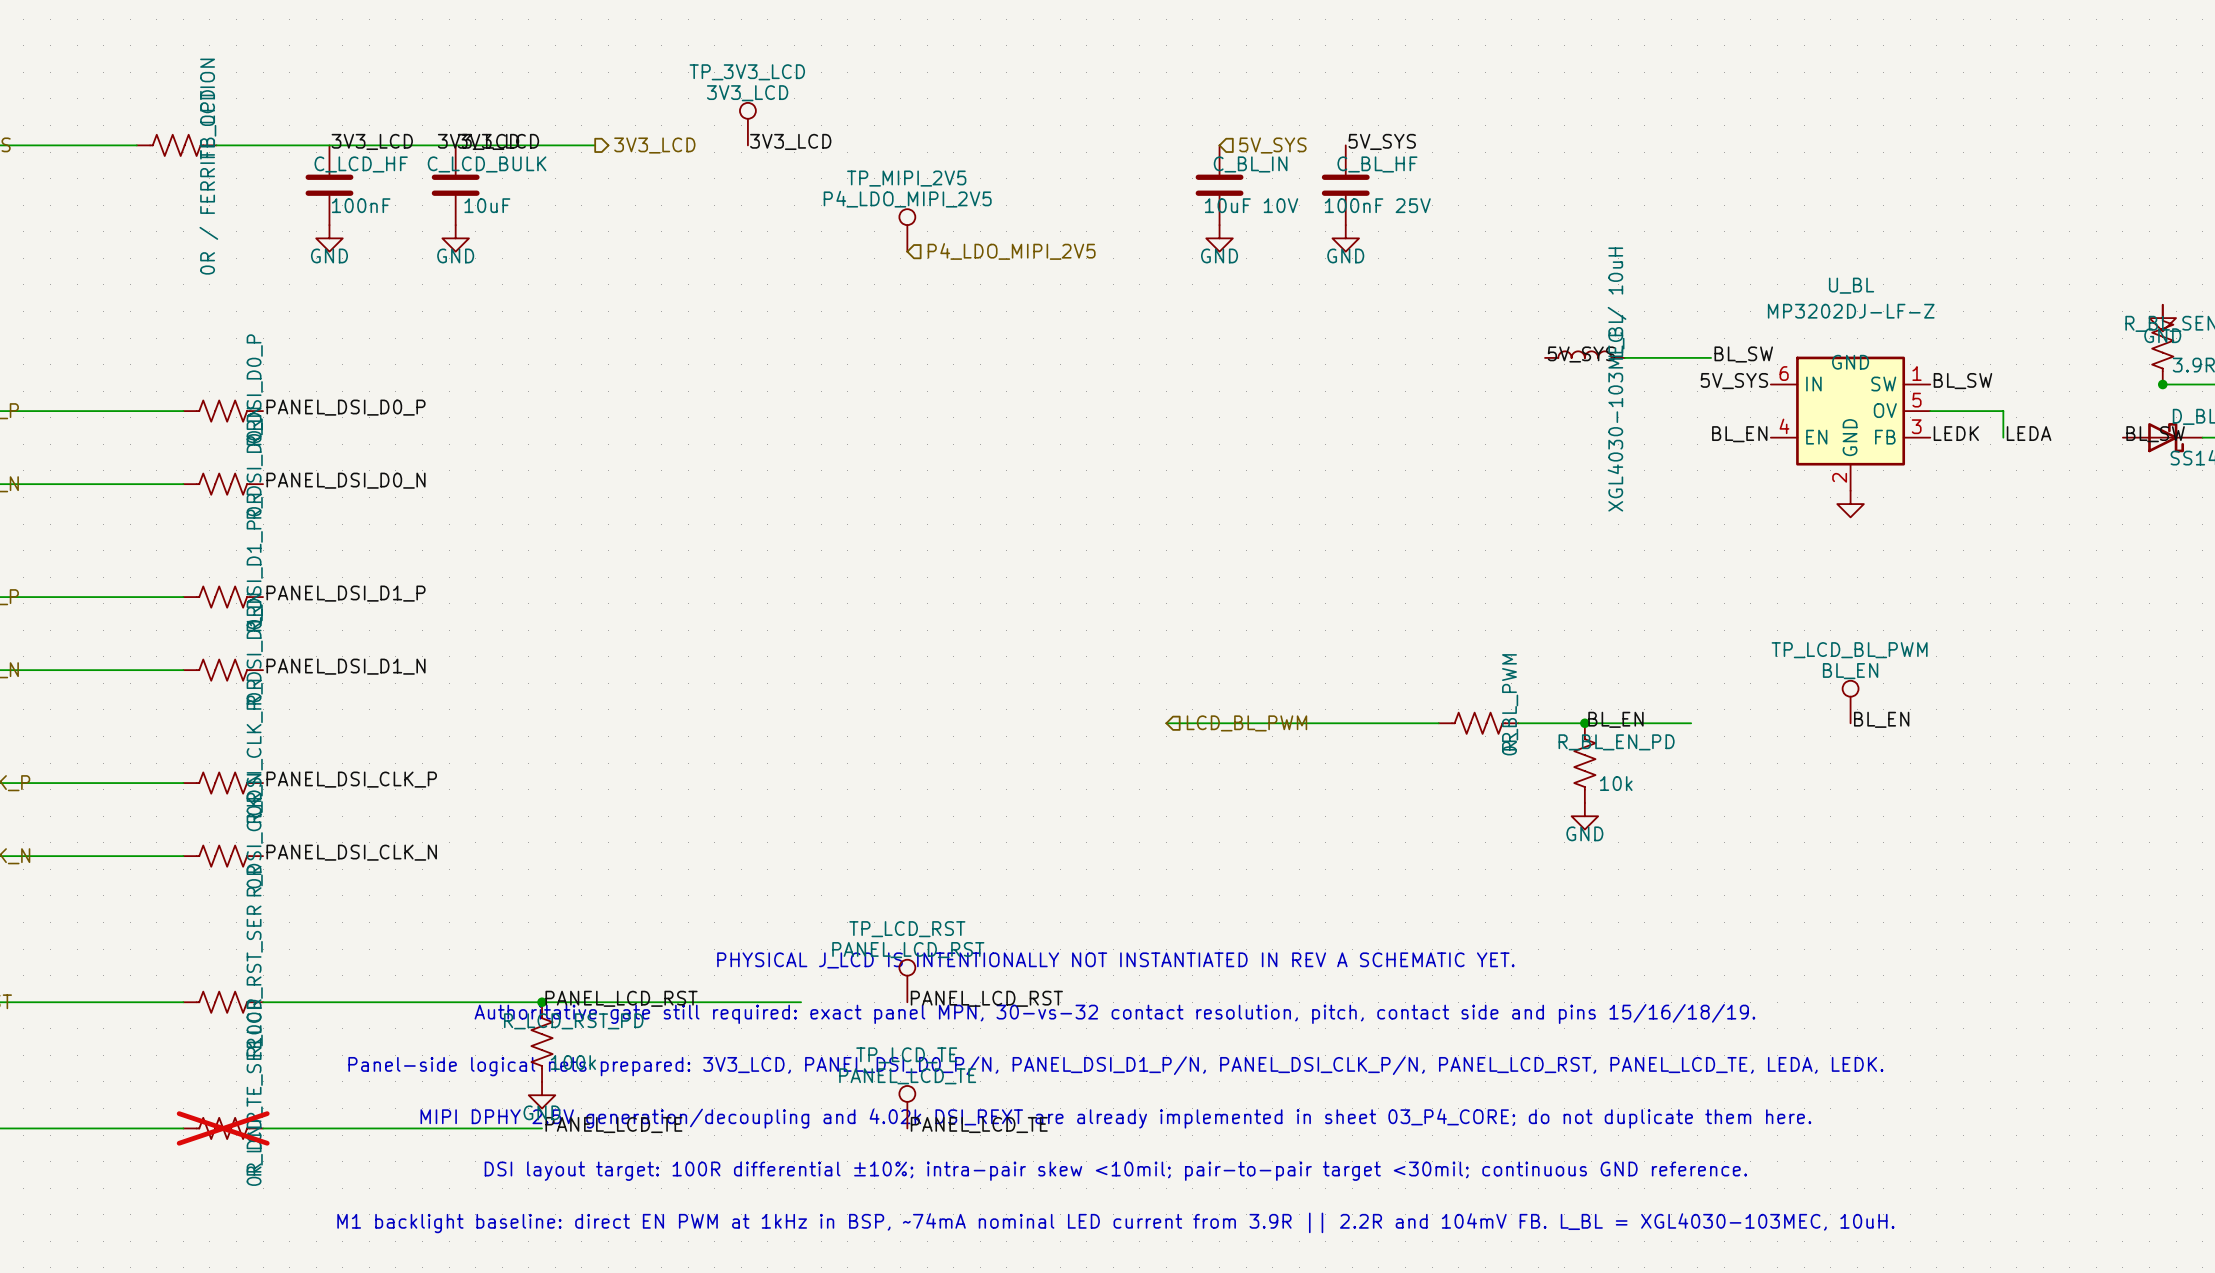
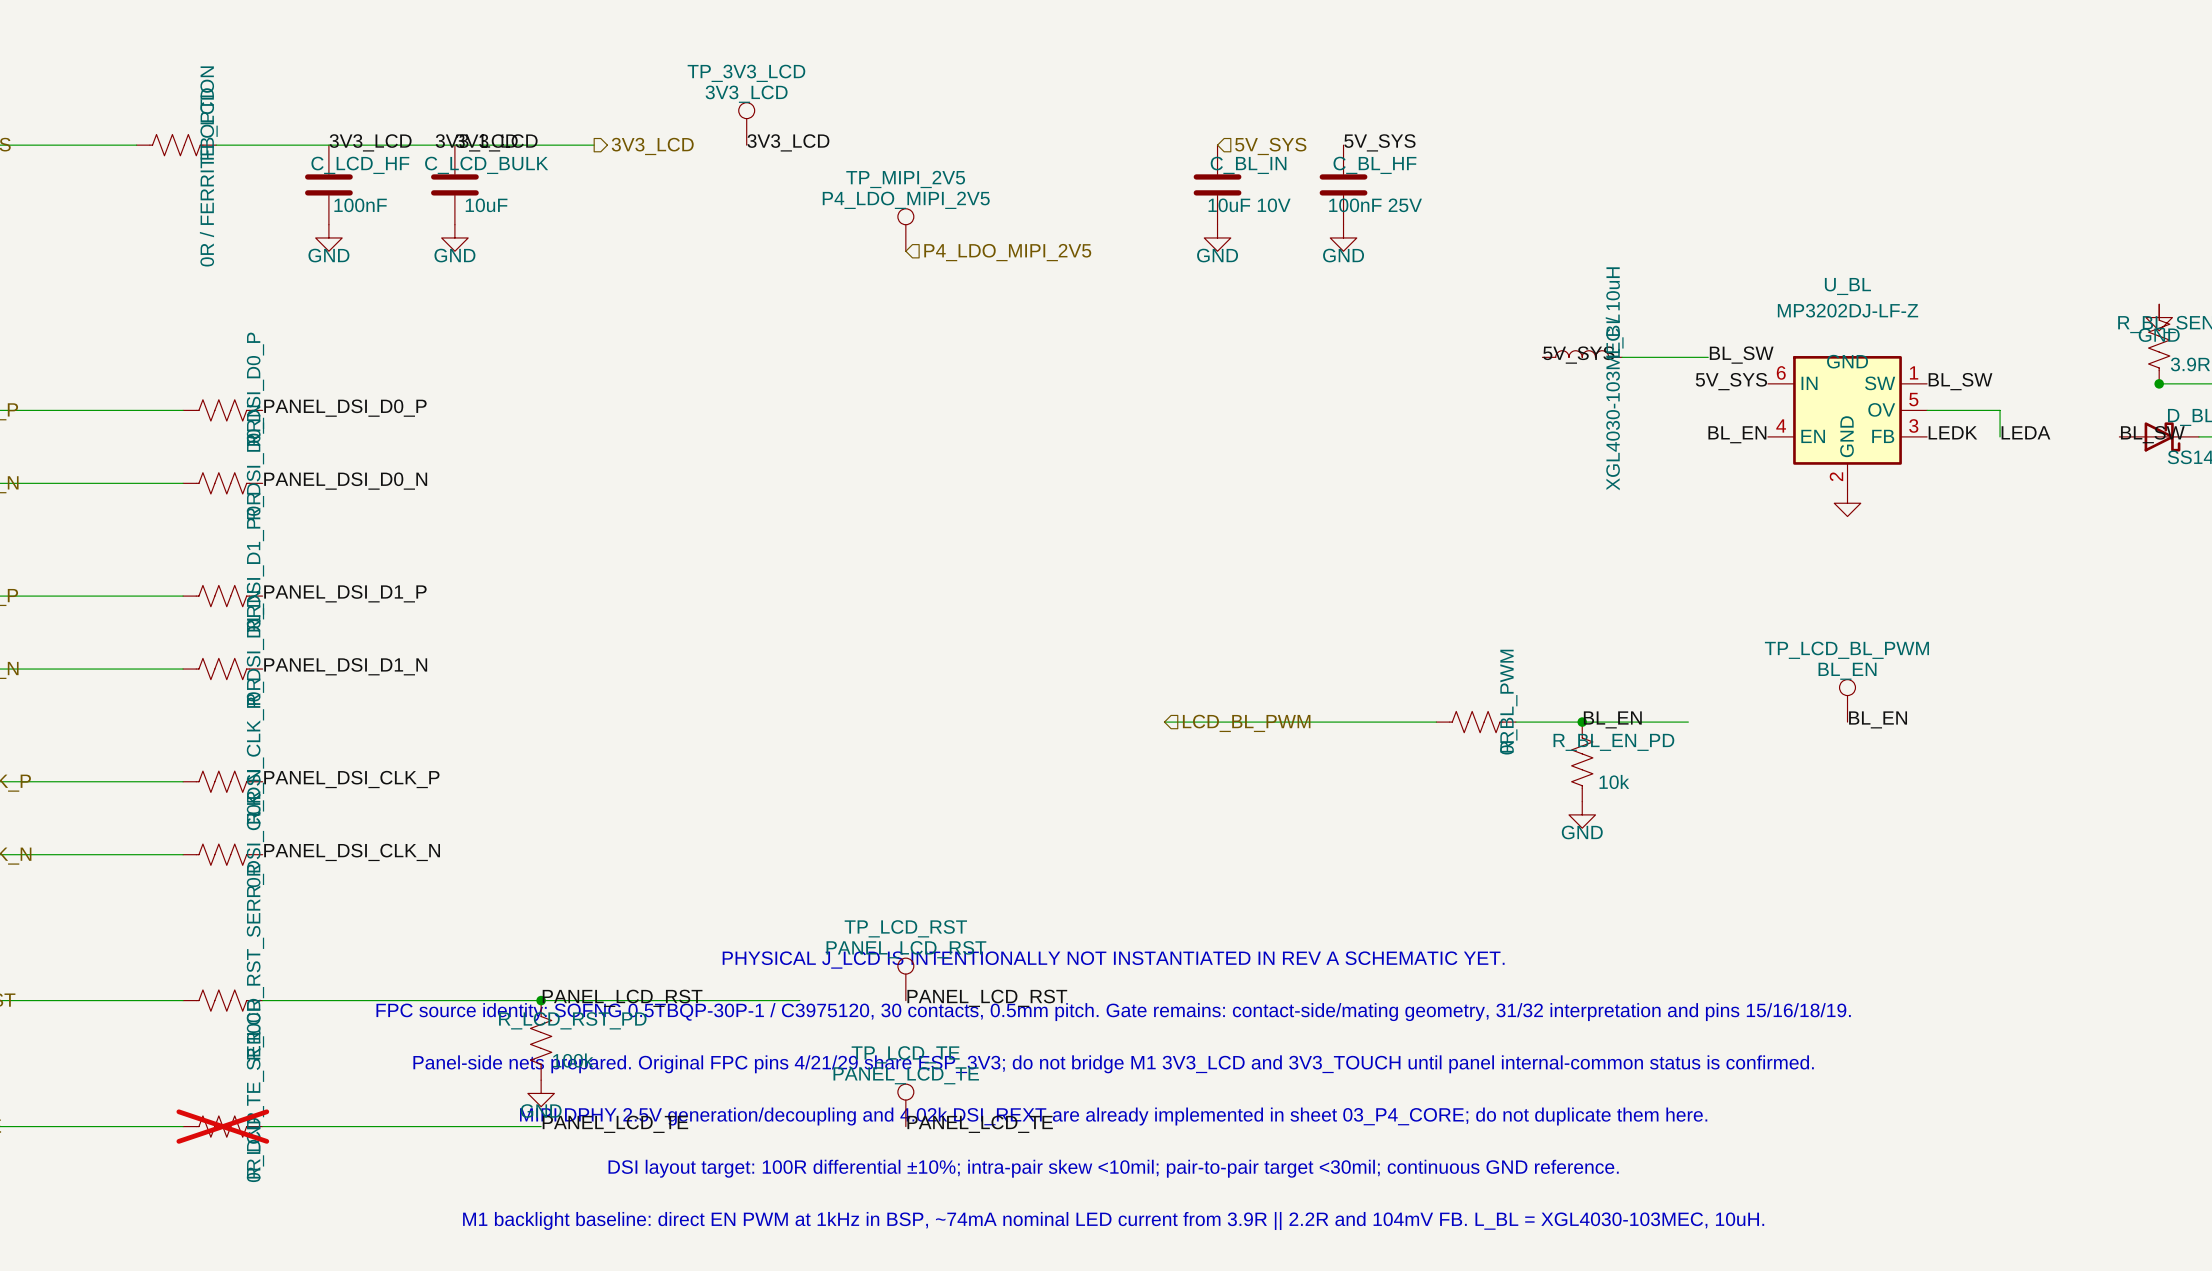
text: Authoritative gate still required: exact panel MPN, 30-vs-32 contact resolution, pitch, contact side and pins 15/16/18/19. (1114, 1014) -> FPC source identity: SOFNG 0.5TBQP-30P-1 / C3975120, 30 contacts, 0.5mm pitch. Gate remains: contact-side/mating geometry, 31/32 interpretation and pins 15/16/18/19. (1113, 1012)
text: Panel-side logical nets prepared: 3V3_LCD, PANEL_DSI_D0_P/N, PANEL_DSI_D1_P/N, PANEL_DSI_CLK_P/N, PANEL_LCD_RST, PANEL_LCD_TE, LEDA, LEDK. (1115, 1066) -> Panel-side nets prepared. Original FPC pins 4/21/29 share ESP_3V3; do not bridge M1 3V3_LCD and 3V3_TOUCH until panel internal-common status is confirmed. (1113, 1064)

